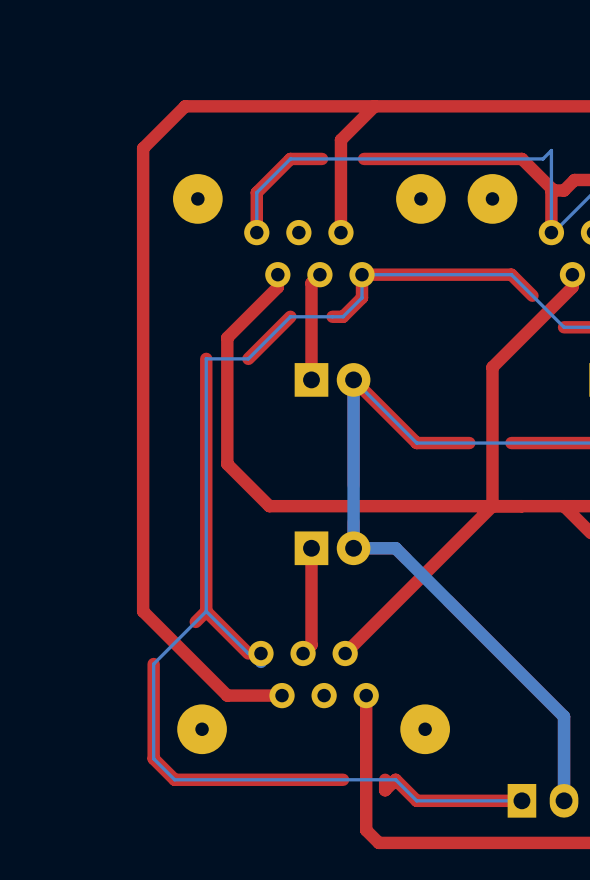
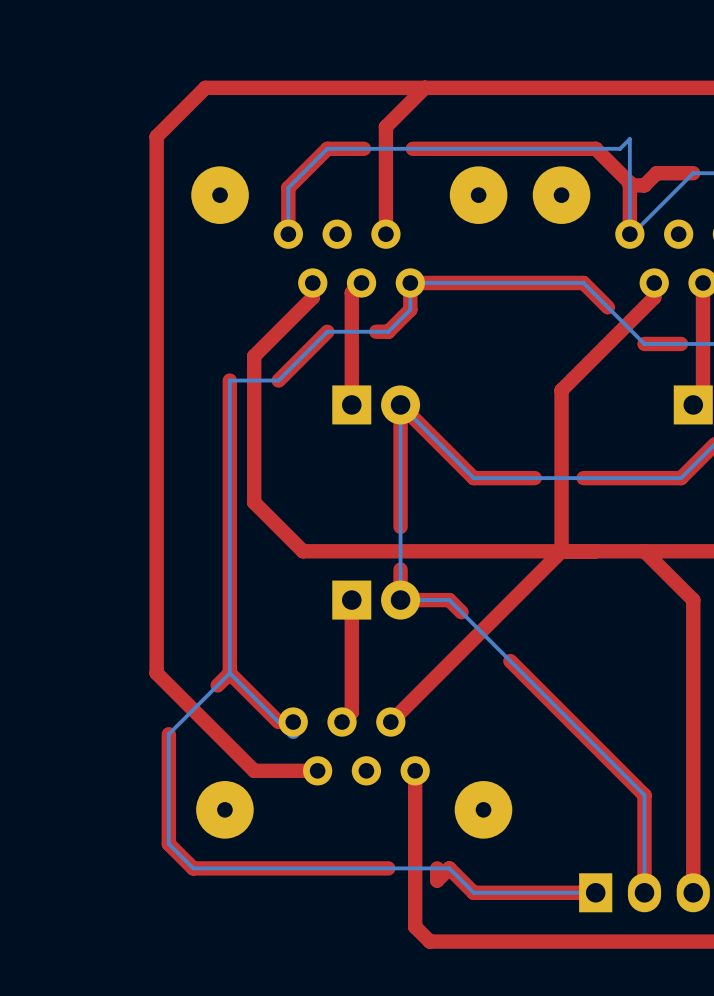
bottom track width: thick (353, 379) (353, 548) (395, 548) (564, 716) (564, 800) -> thin (400, 404) (400, 600) (449, 600) (644, 795) (644, 892)

